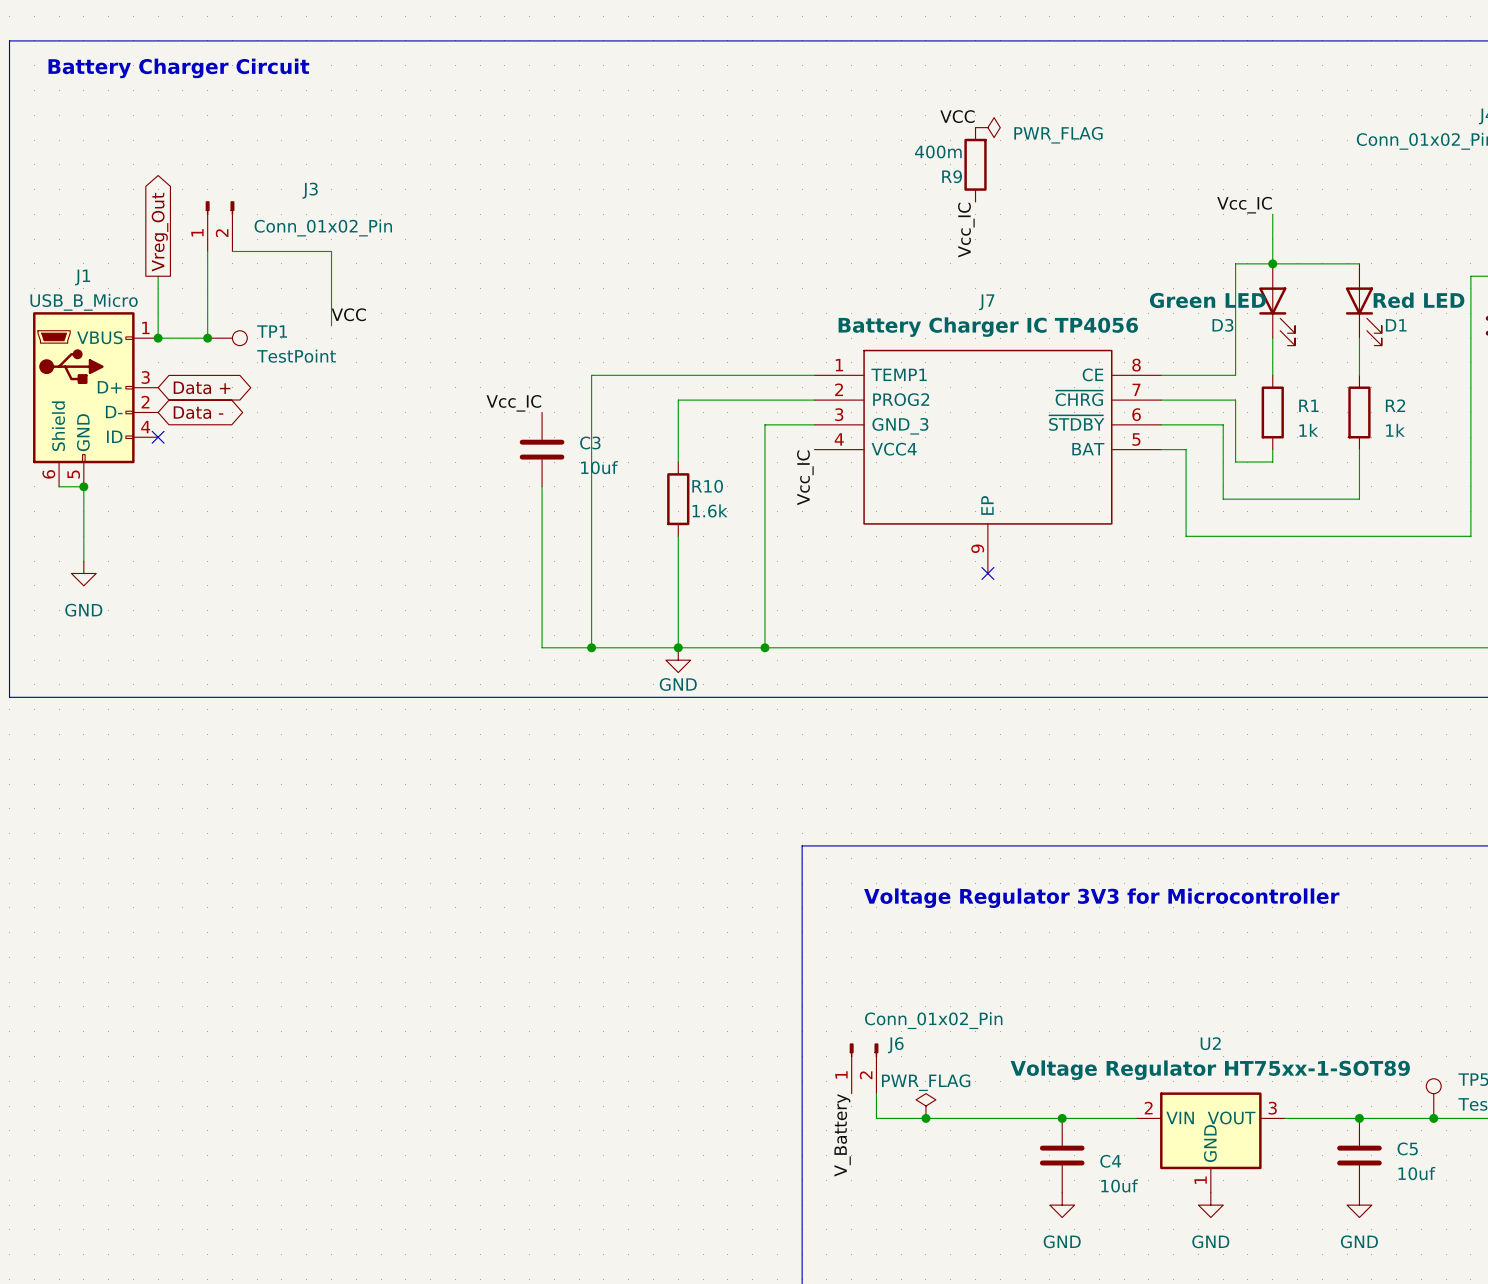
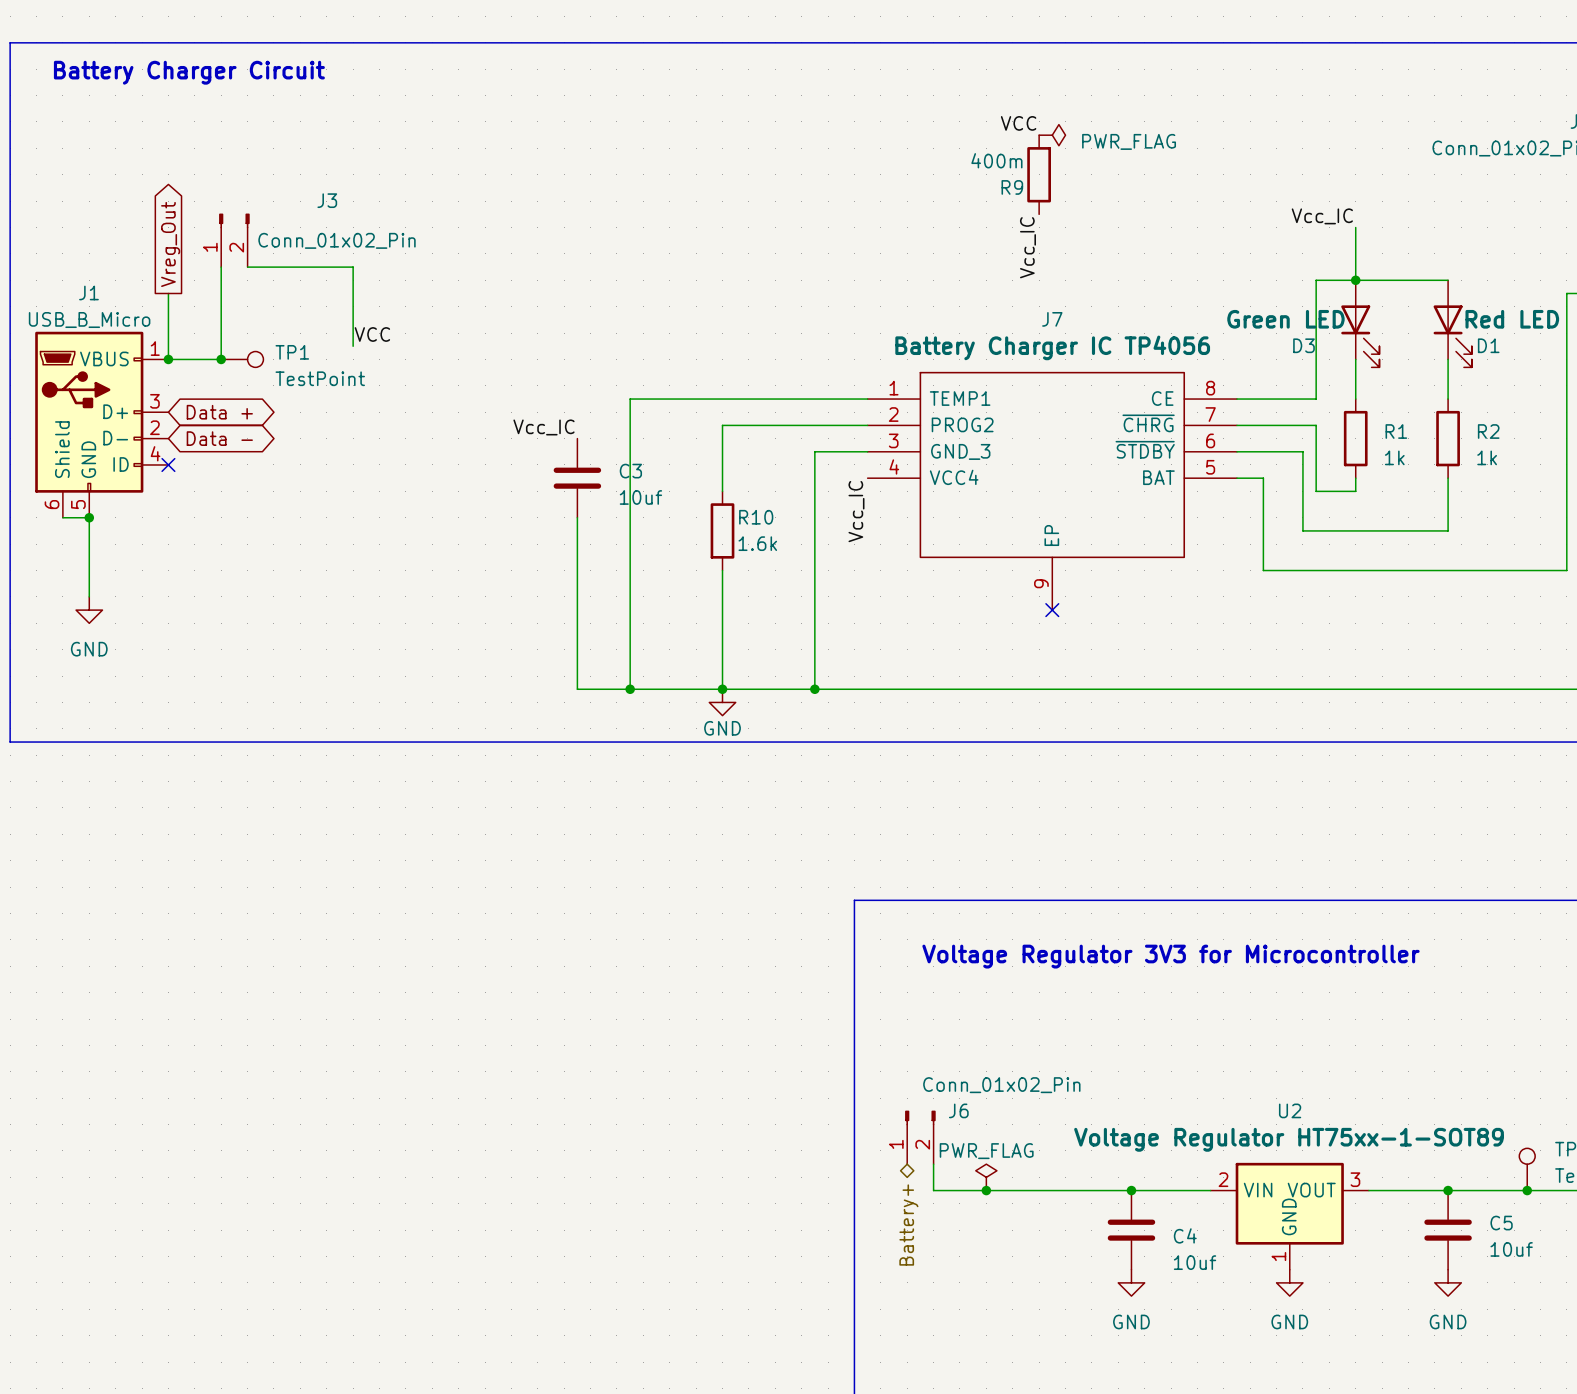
label: V_Battery (842, 1135) -> none
hierarchical label: none -> Battery+ (908, 1225)

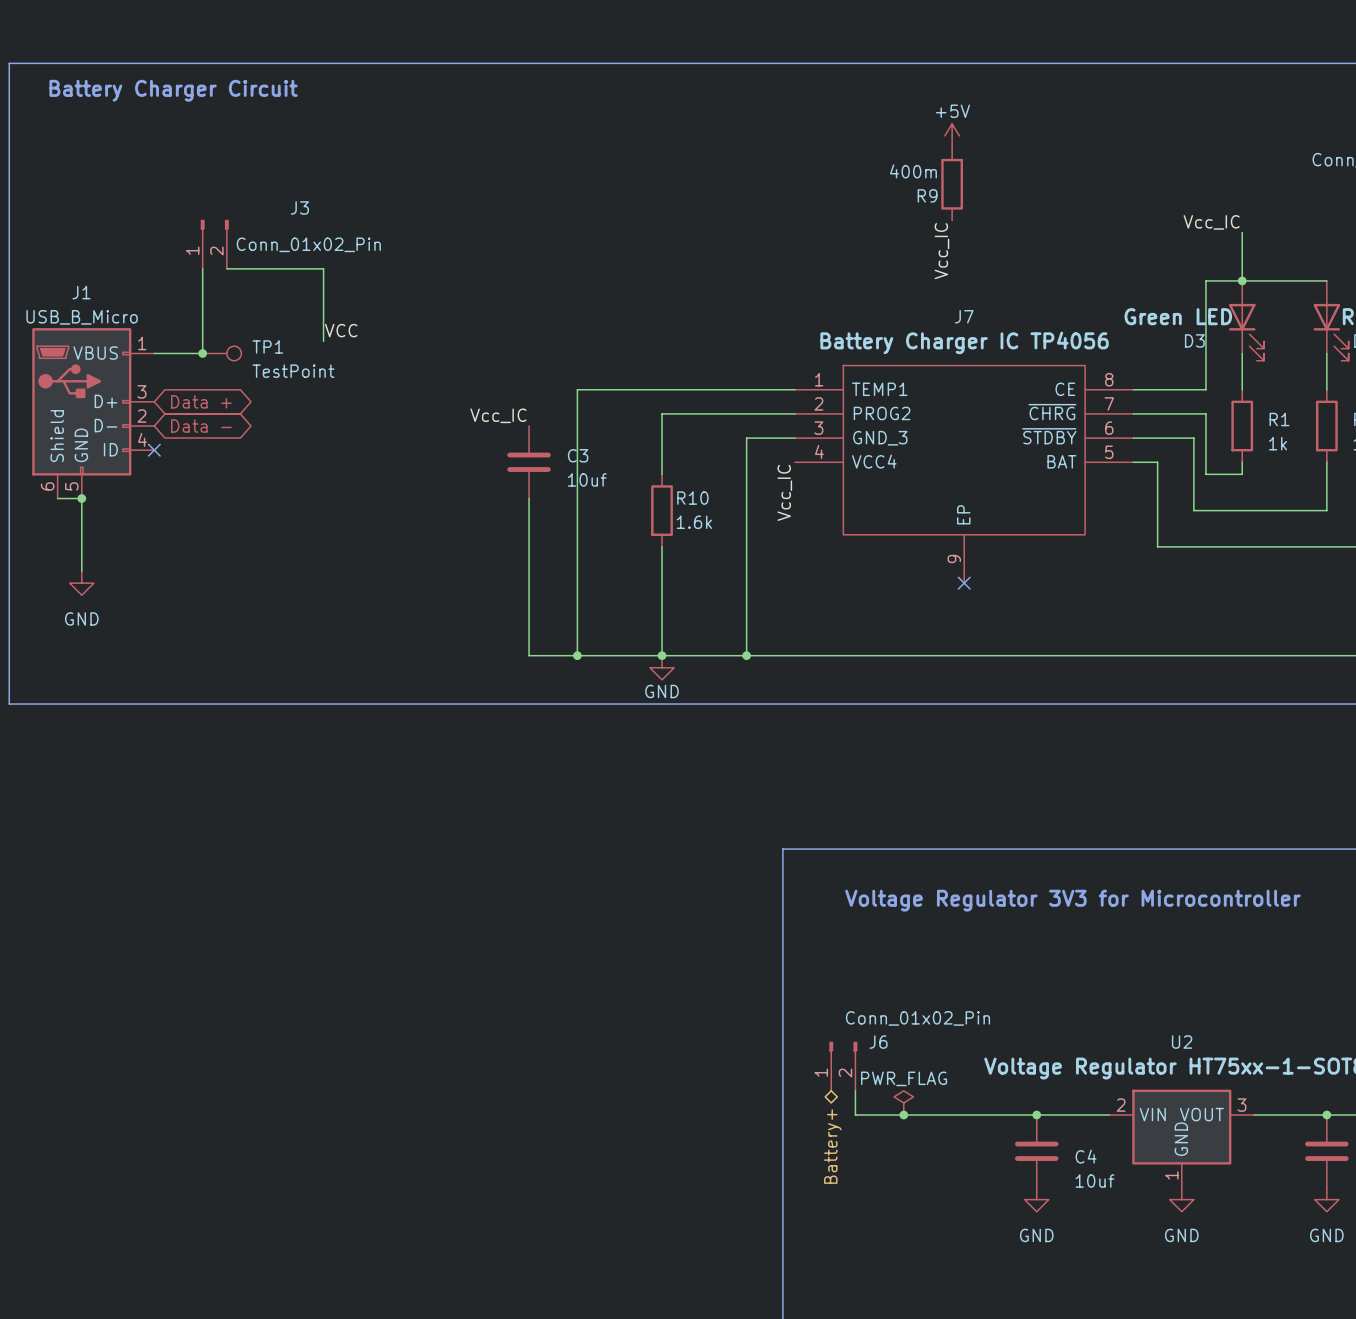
power symbol: none -> +5V (952, 135)
label: VCC (1018, 123) -> none
power symbol: PWR_FLAG (1052, 135) -> none
global label: Vreg_Out (170, 244) -> none
wire: (168, 293) (168, 359) -> none
junction: (168, 359) -> none

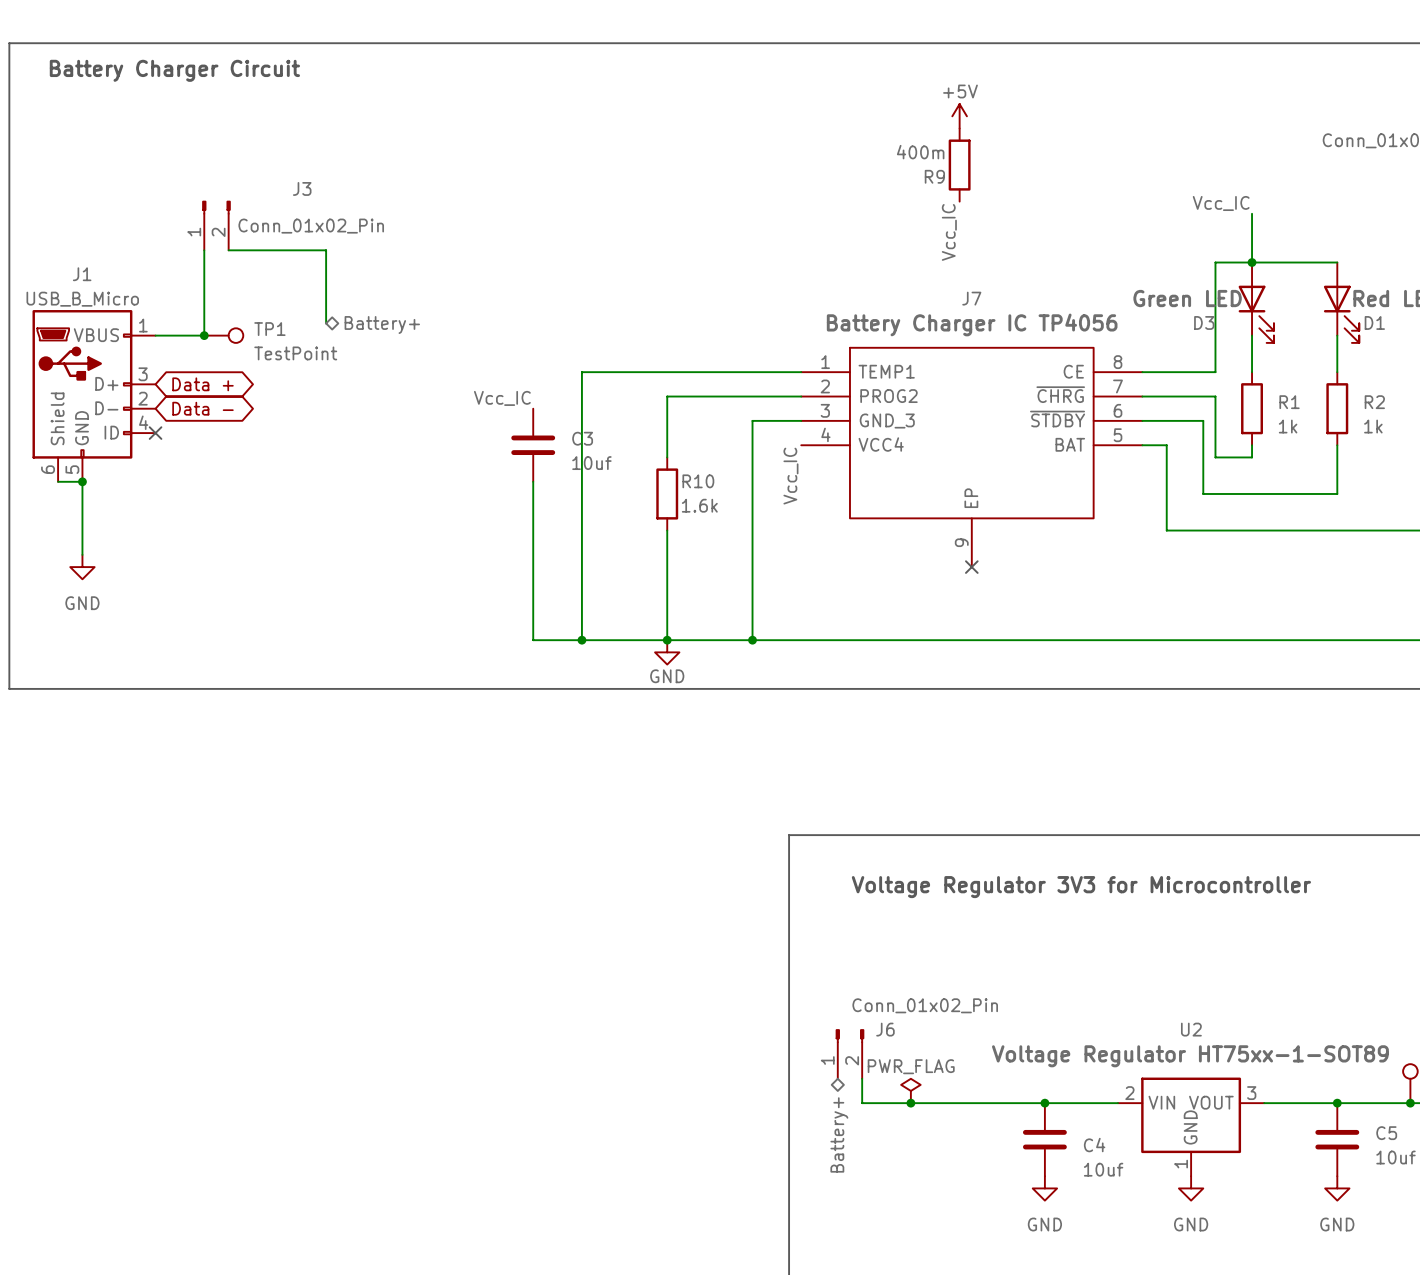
label: VCC (341, 330) -> none
hierarchical label: none -> Battery+ (382, 325)

